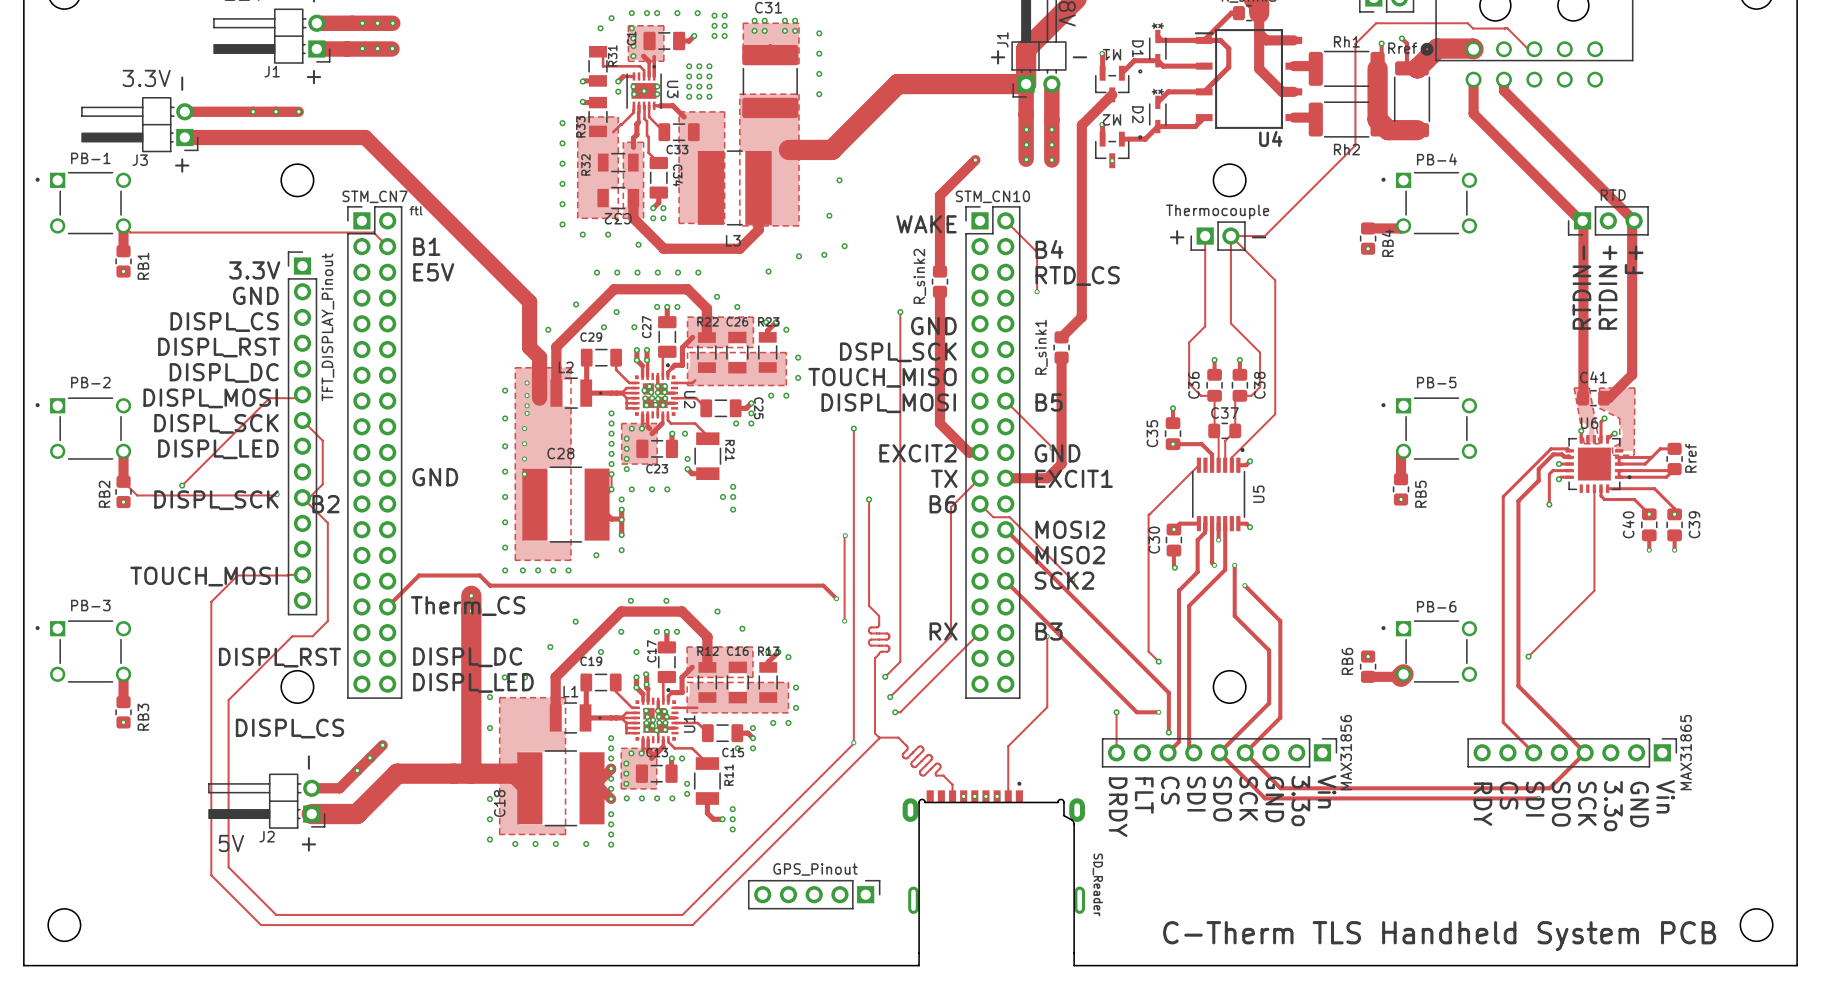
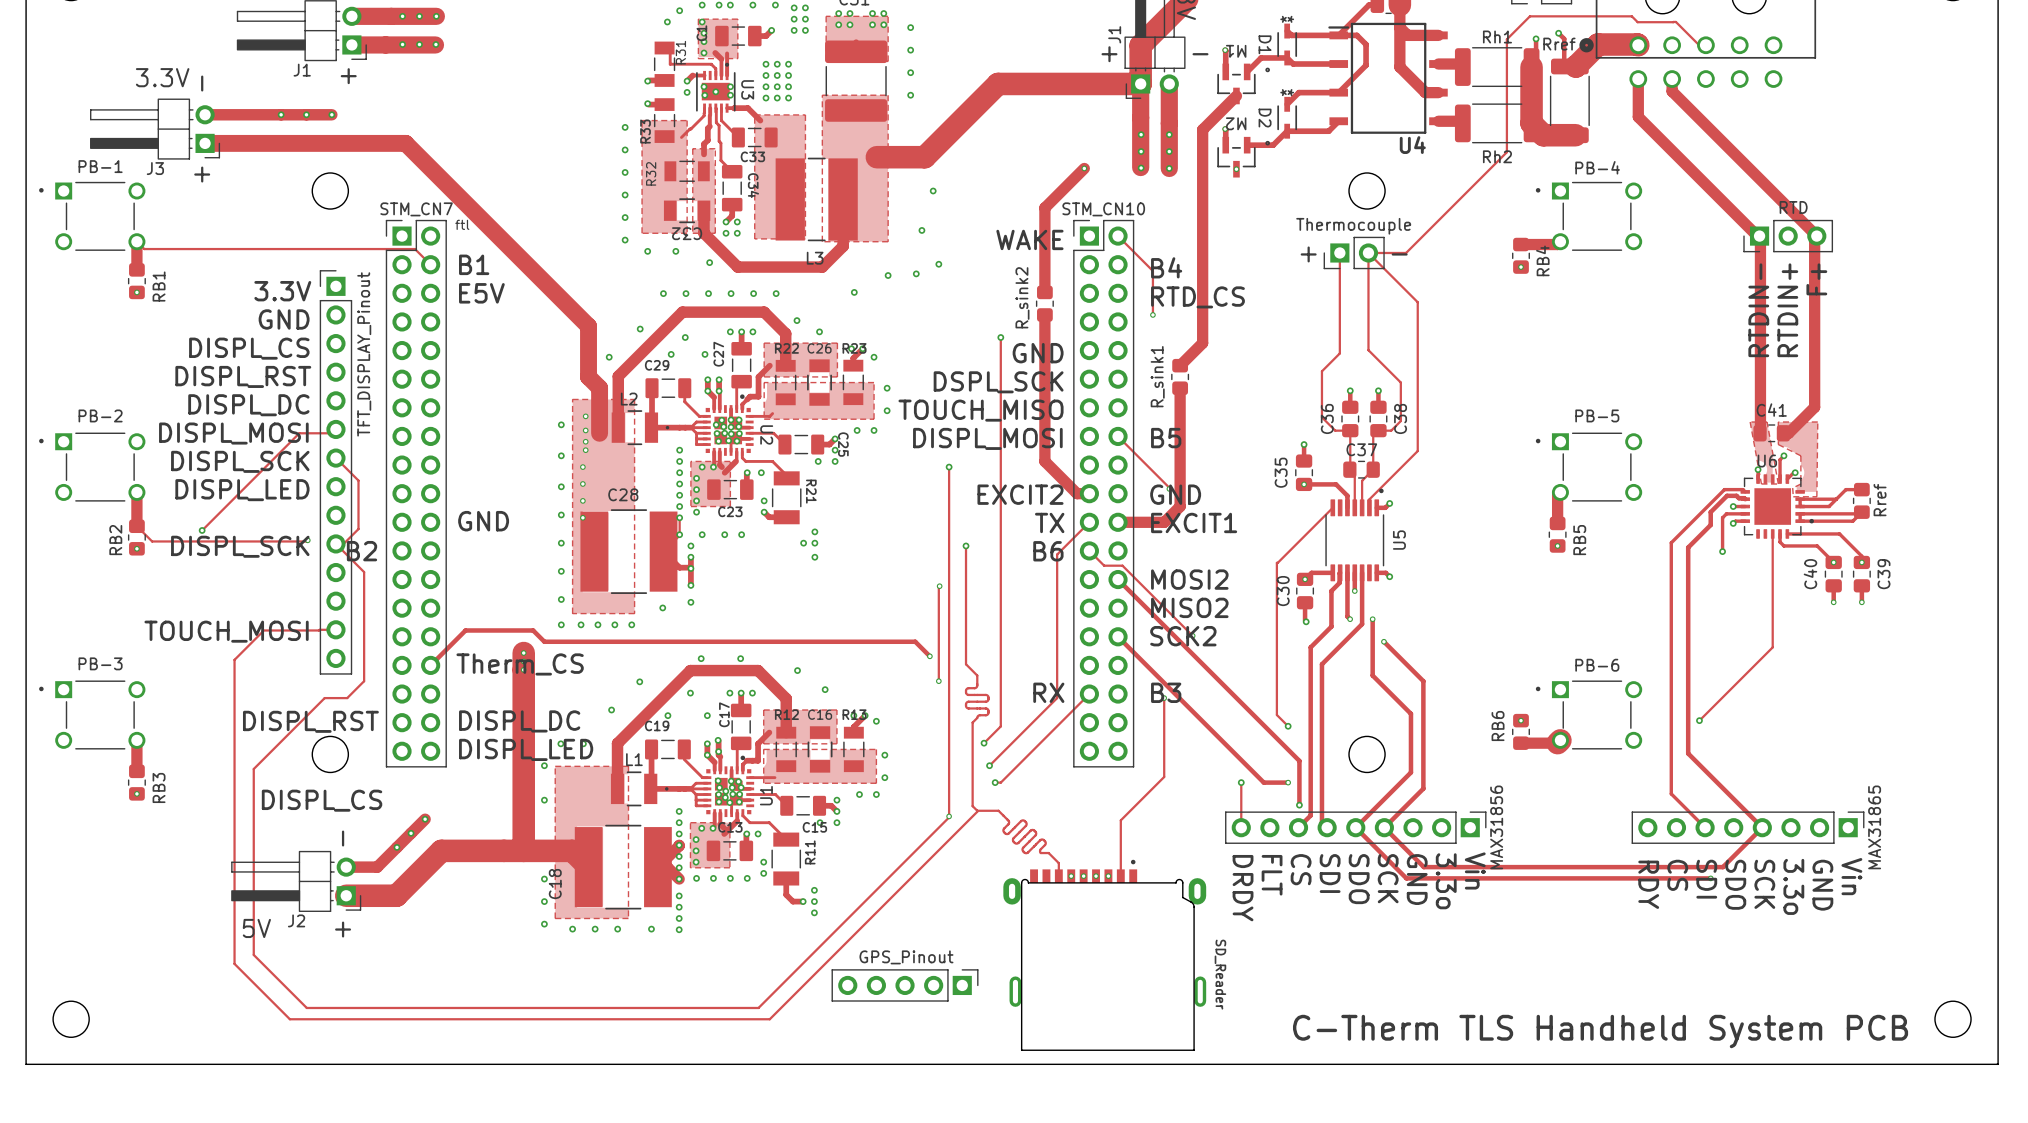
SD_Reader footprint: [902, 781, 1086, 954] -> [1003, 859, 1207, 1051]
board edge: (919, 952) (919, 965) -> (1194, 1064) (1021, 1064)
board edge: (1074, 952) (1074, 965) -> none

